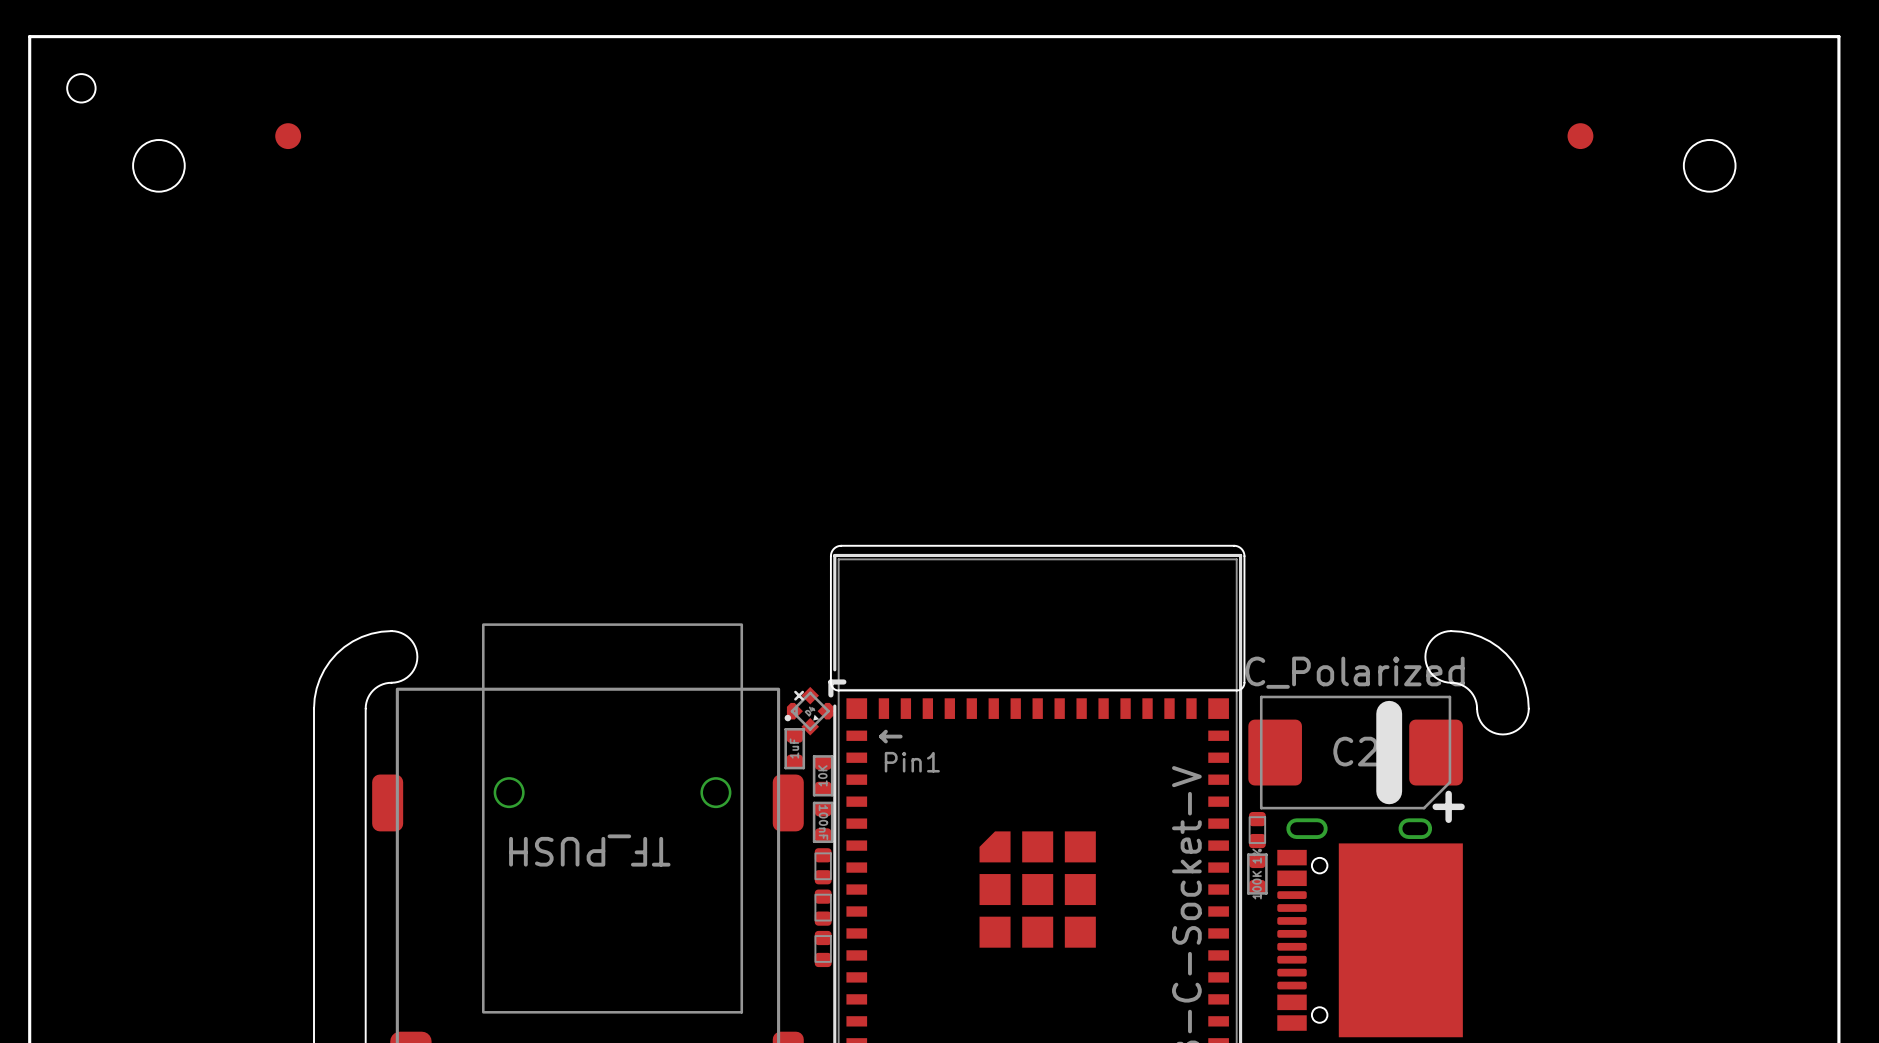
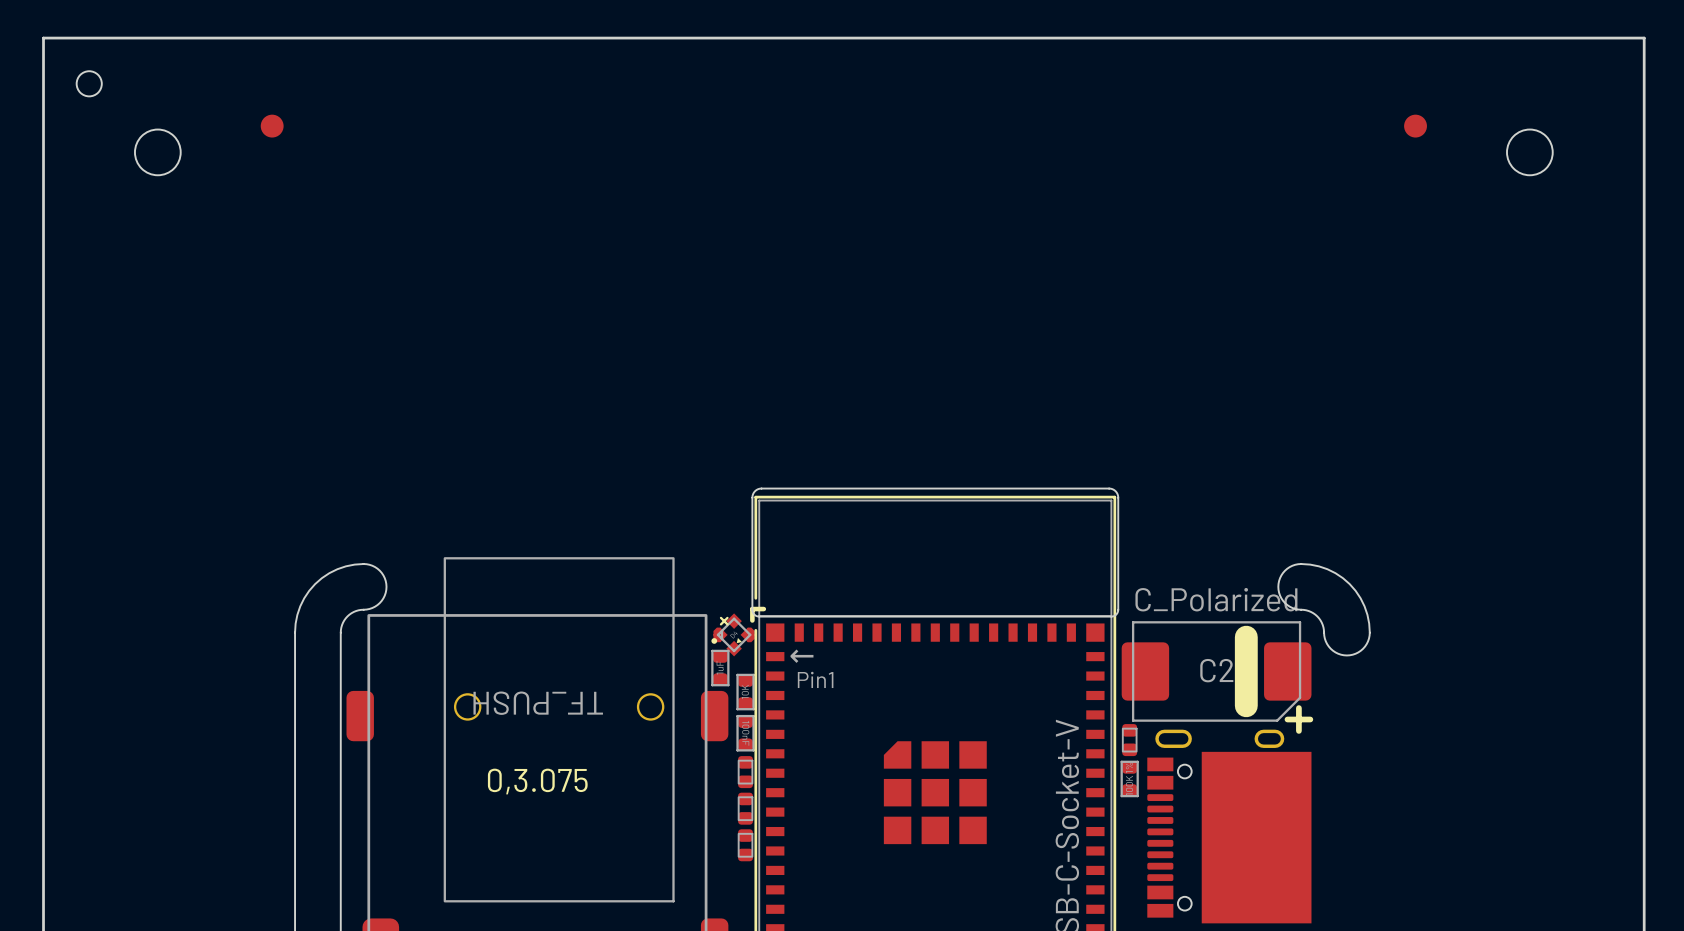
part value position: TF_PUSH (589, 850) -> TF_PUSH (538, 703)
part text: none -> 0,3.075 (537, 781)

